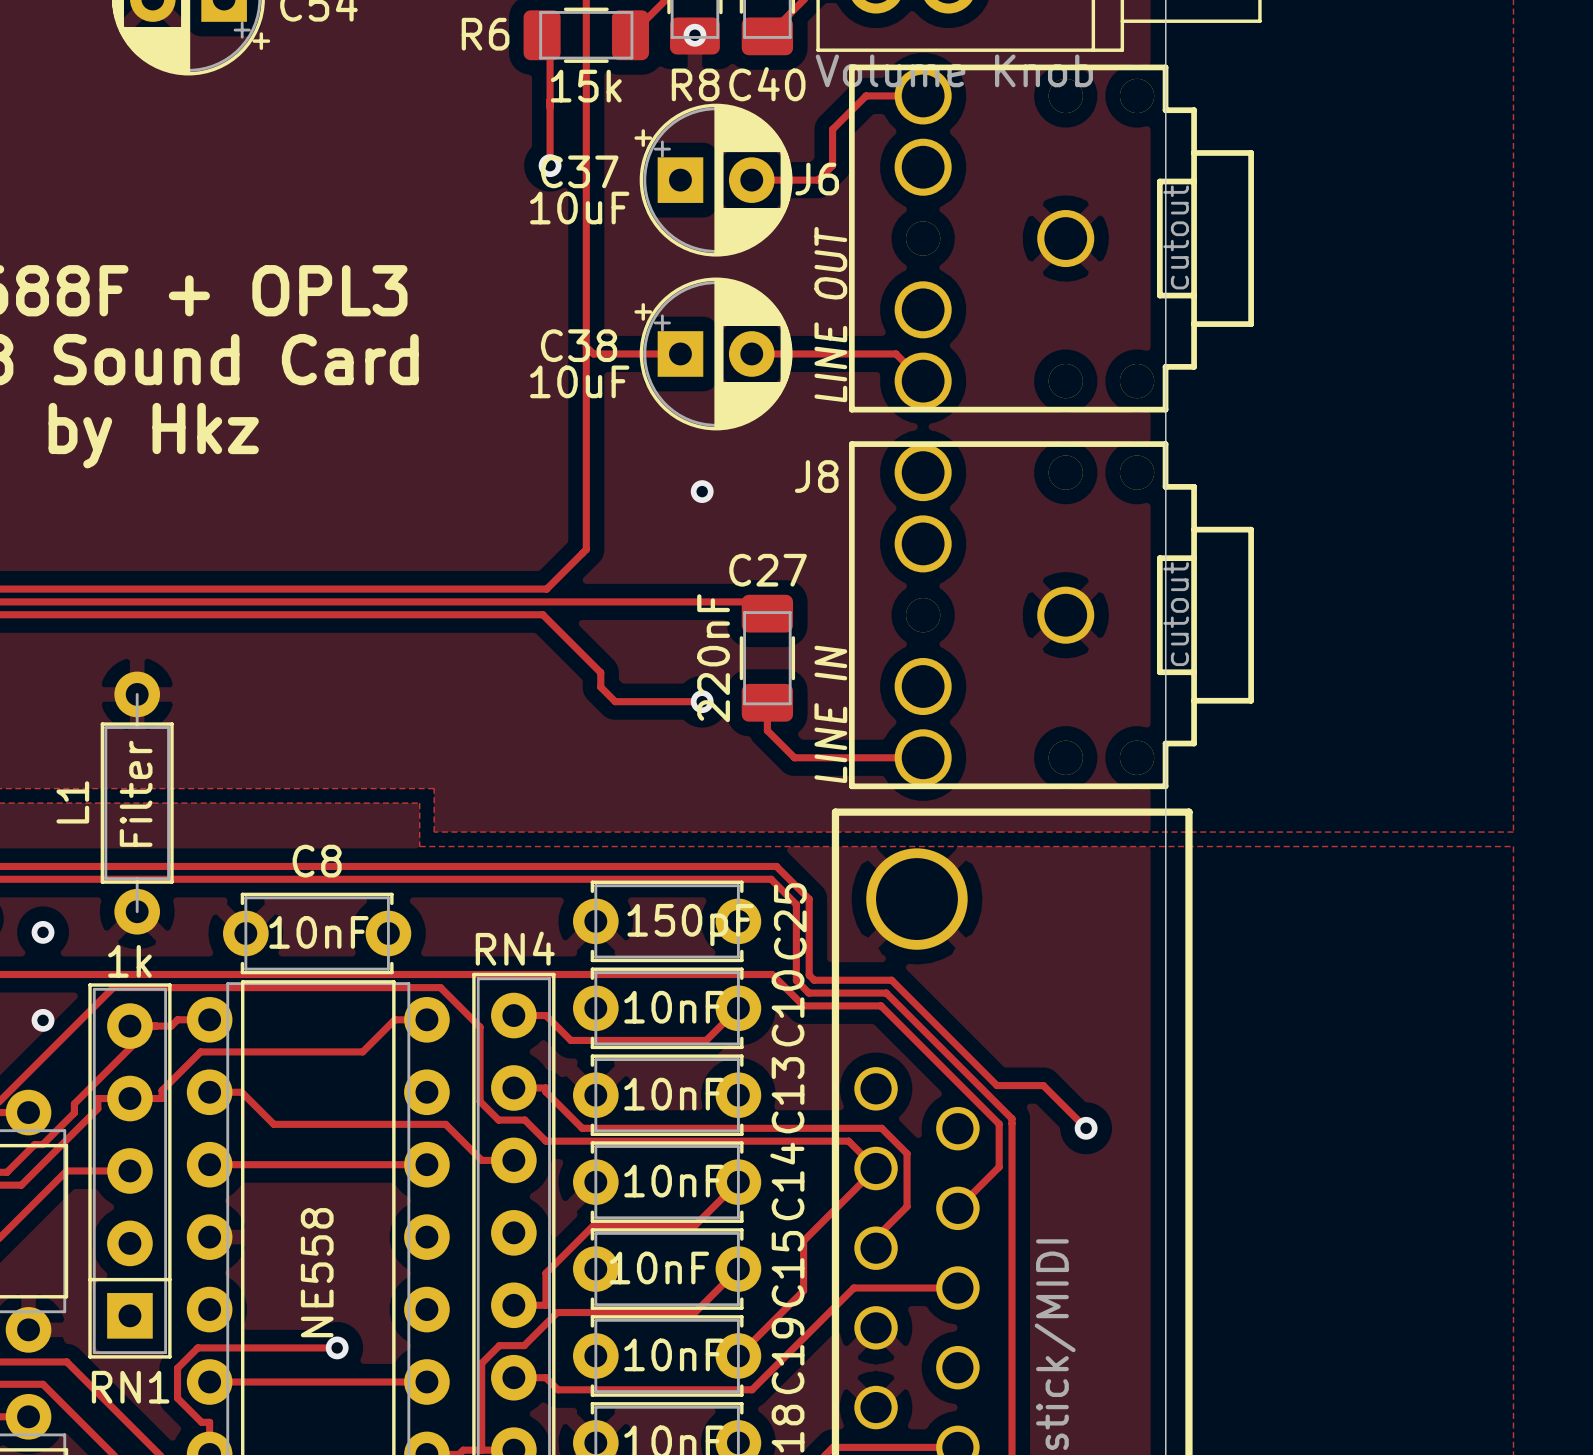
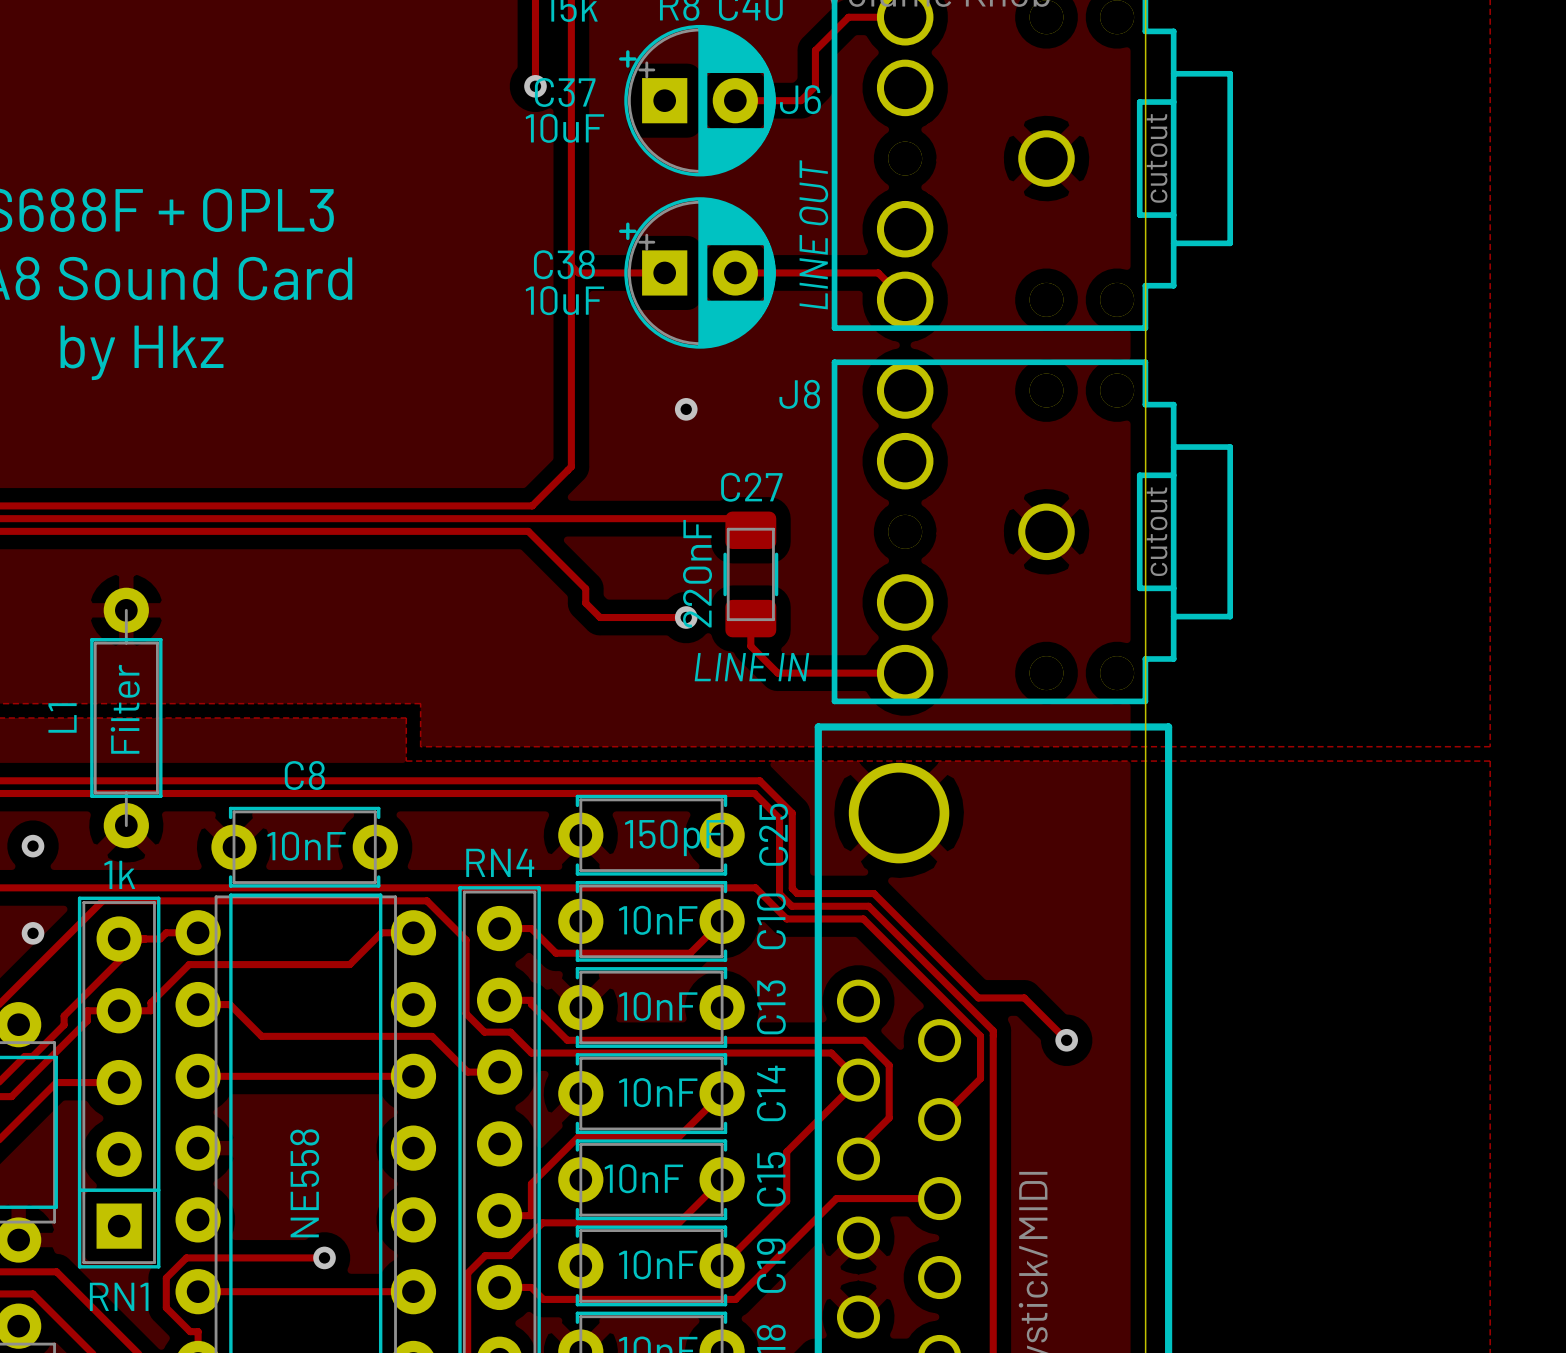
J8 value rotation: 0° (830, 714) -> 90° clockwise (751, 667)

